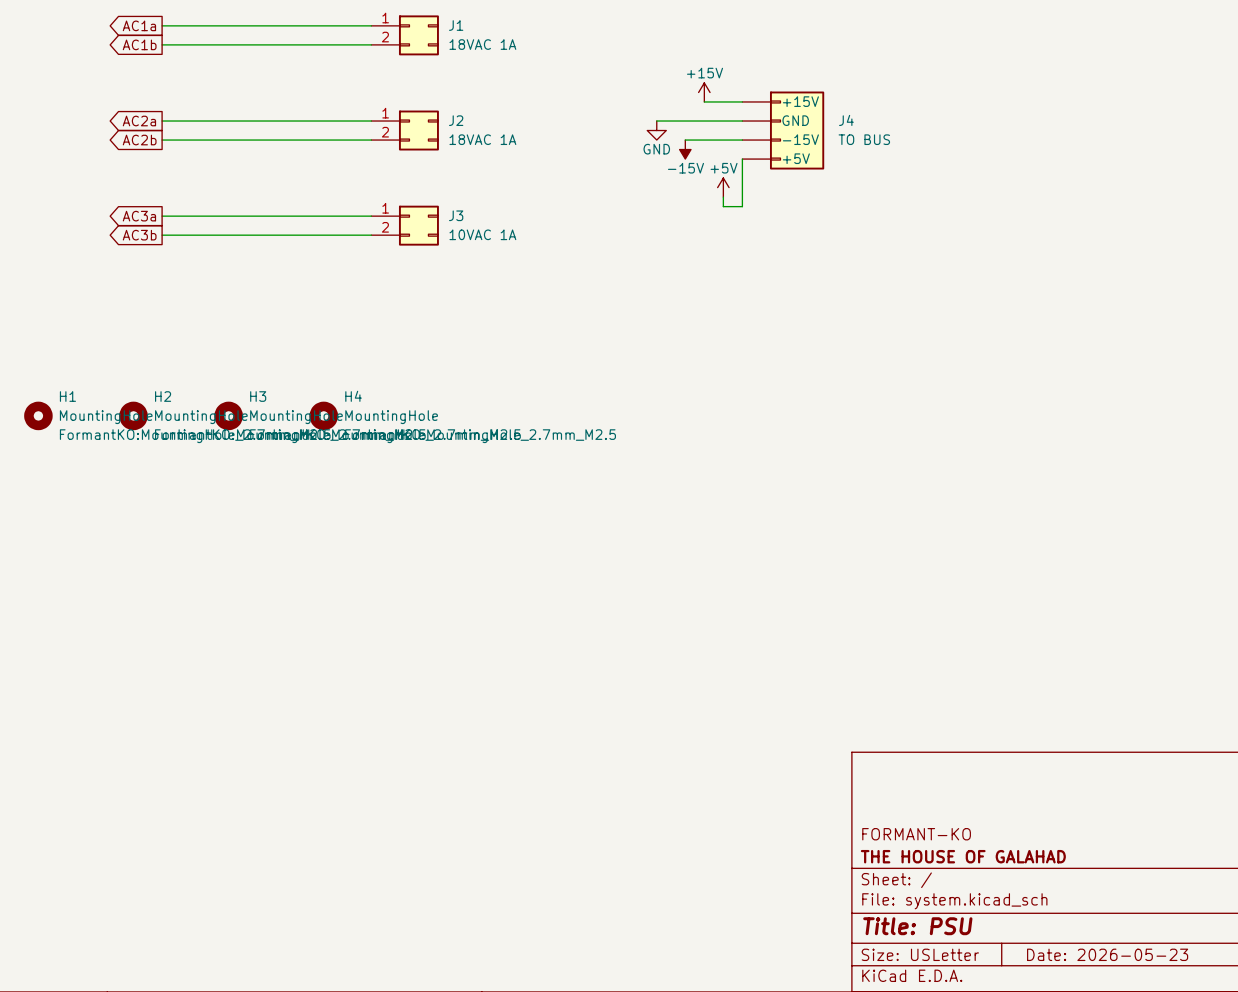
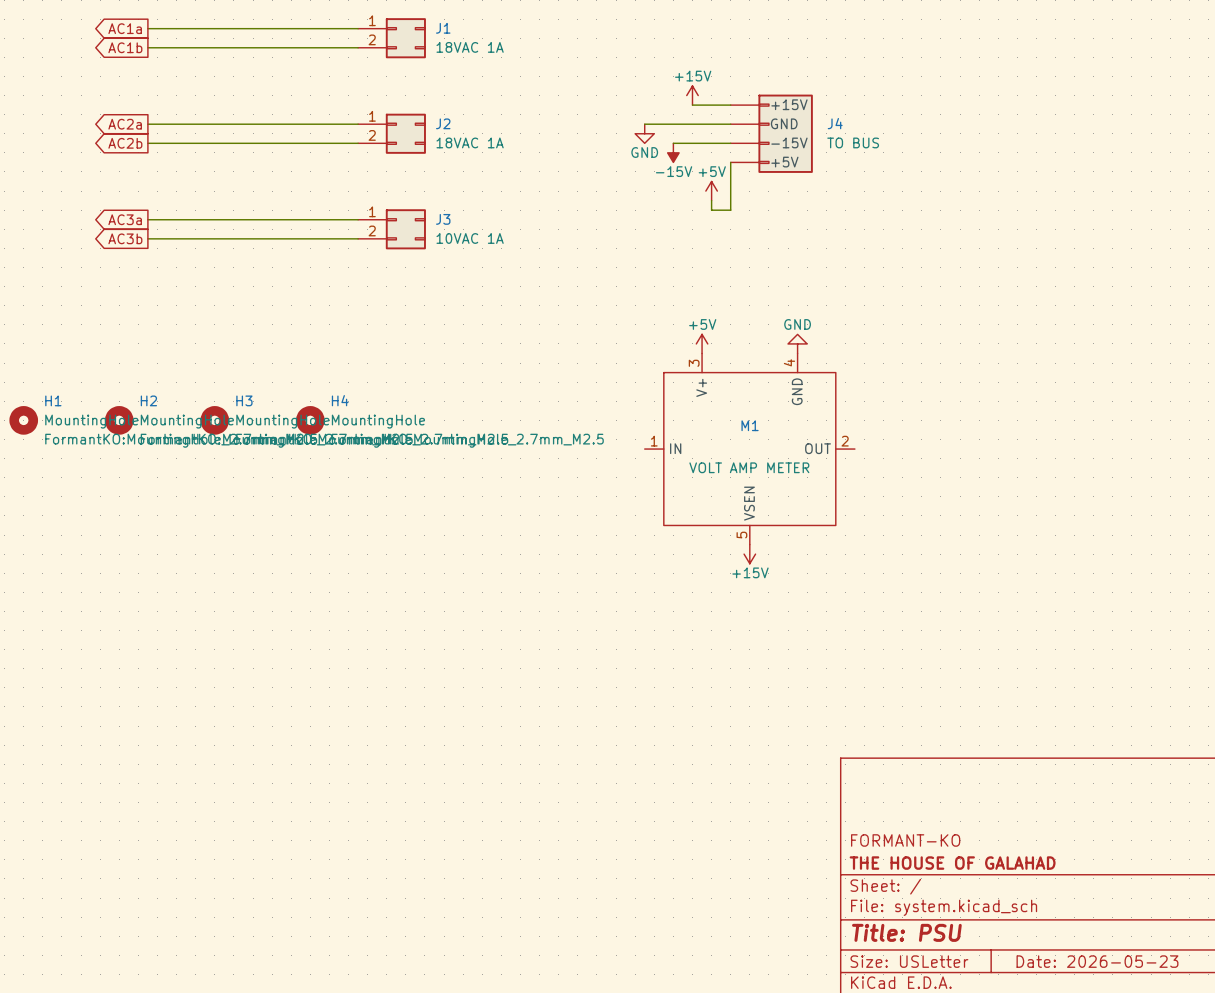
power symbol: none -> +5V (702, 343)
power symbol: none -> GND (797, 343)
M1: none -> VOLT AMP METER (749, 449)
power symbol: none -> +15V (749, 554)

